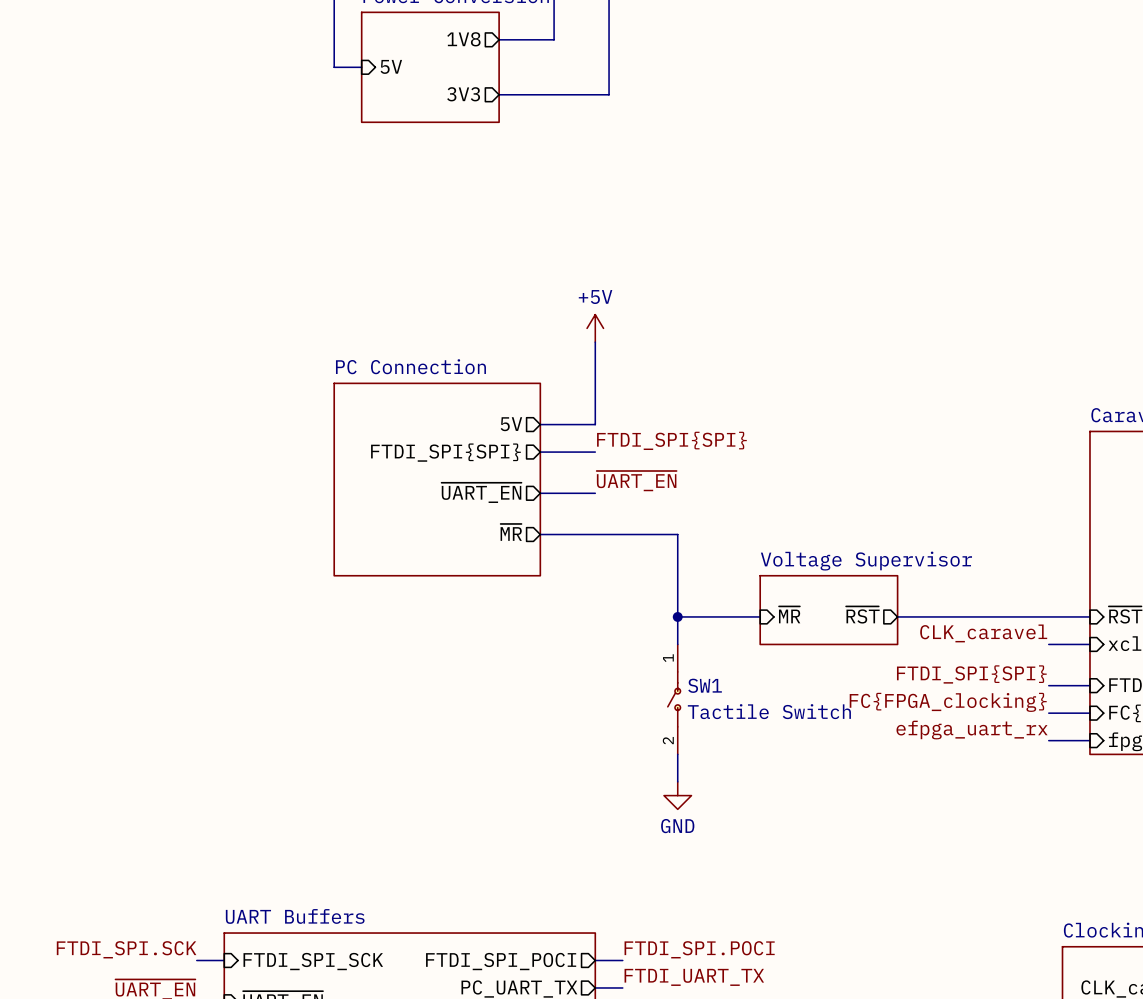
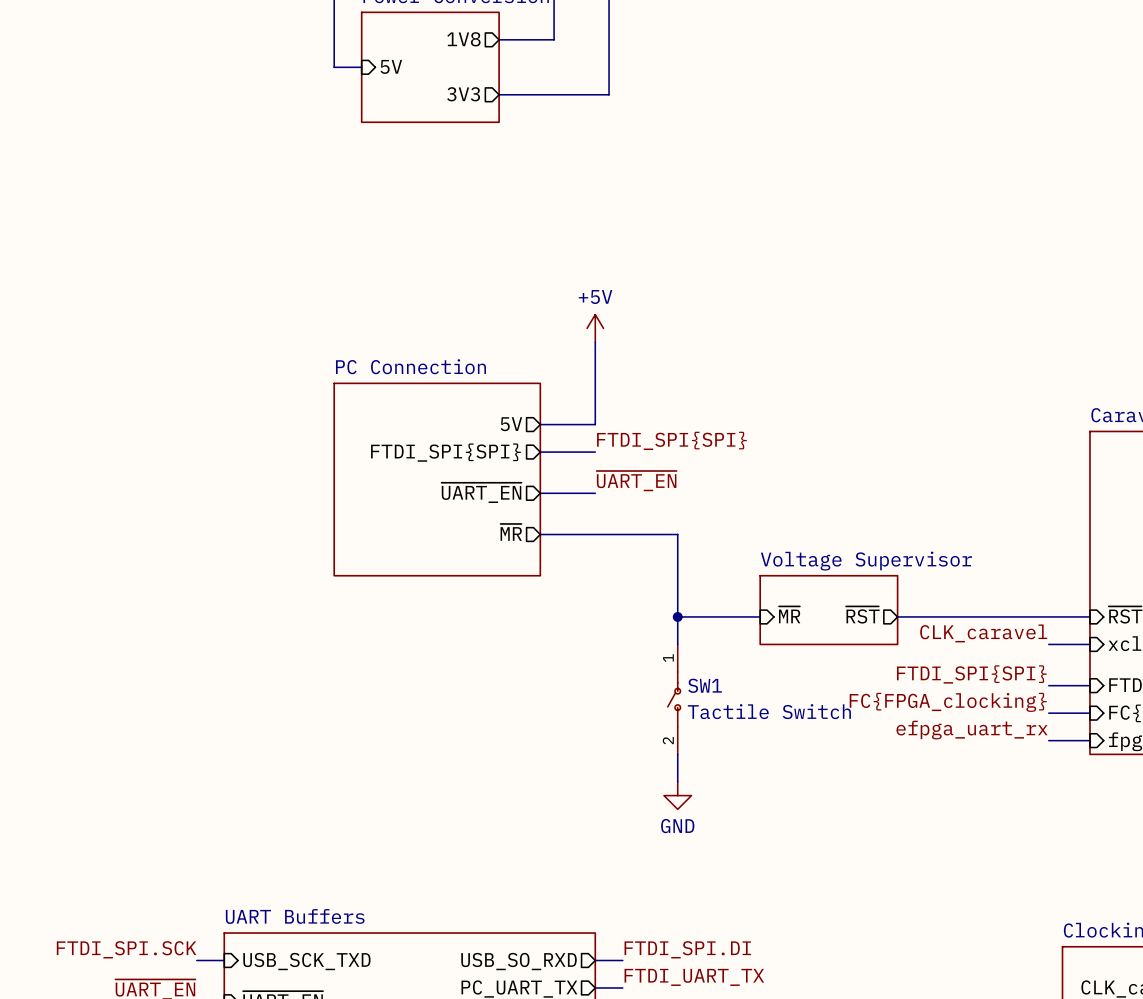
label: FTDI_SPI.POCI (699, 949) -> FTDI_SPI.DI (687, 949)
sheet pin: FTDI_SPI_SCK (313, 961) -> USB_SCK_TXD (306, 961)
sheet pin: FTDI_SPI_POCI (501, 961) -> USB_SO_RXD (519, 961)

